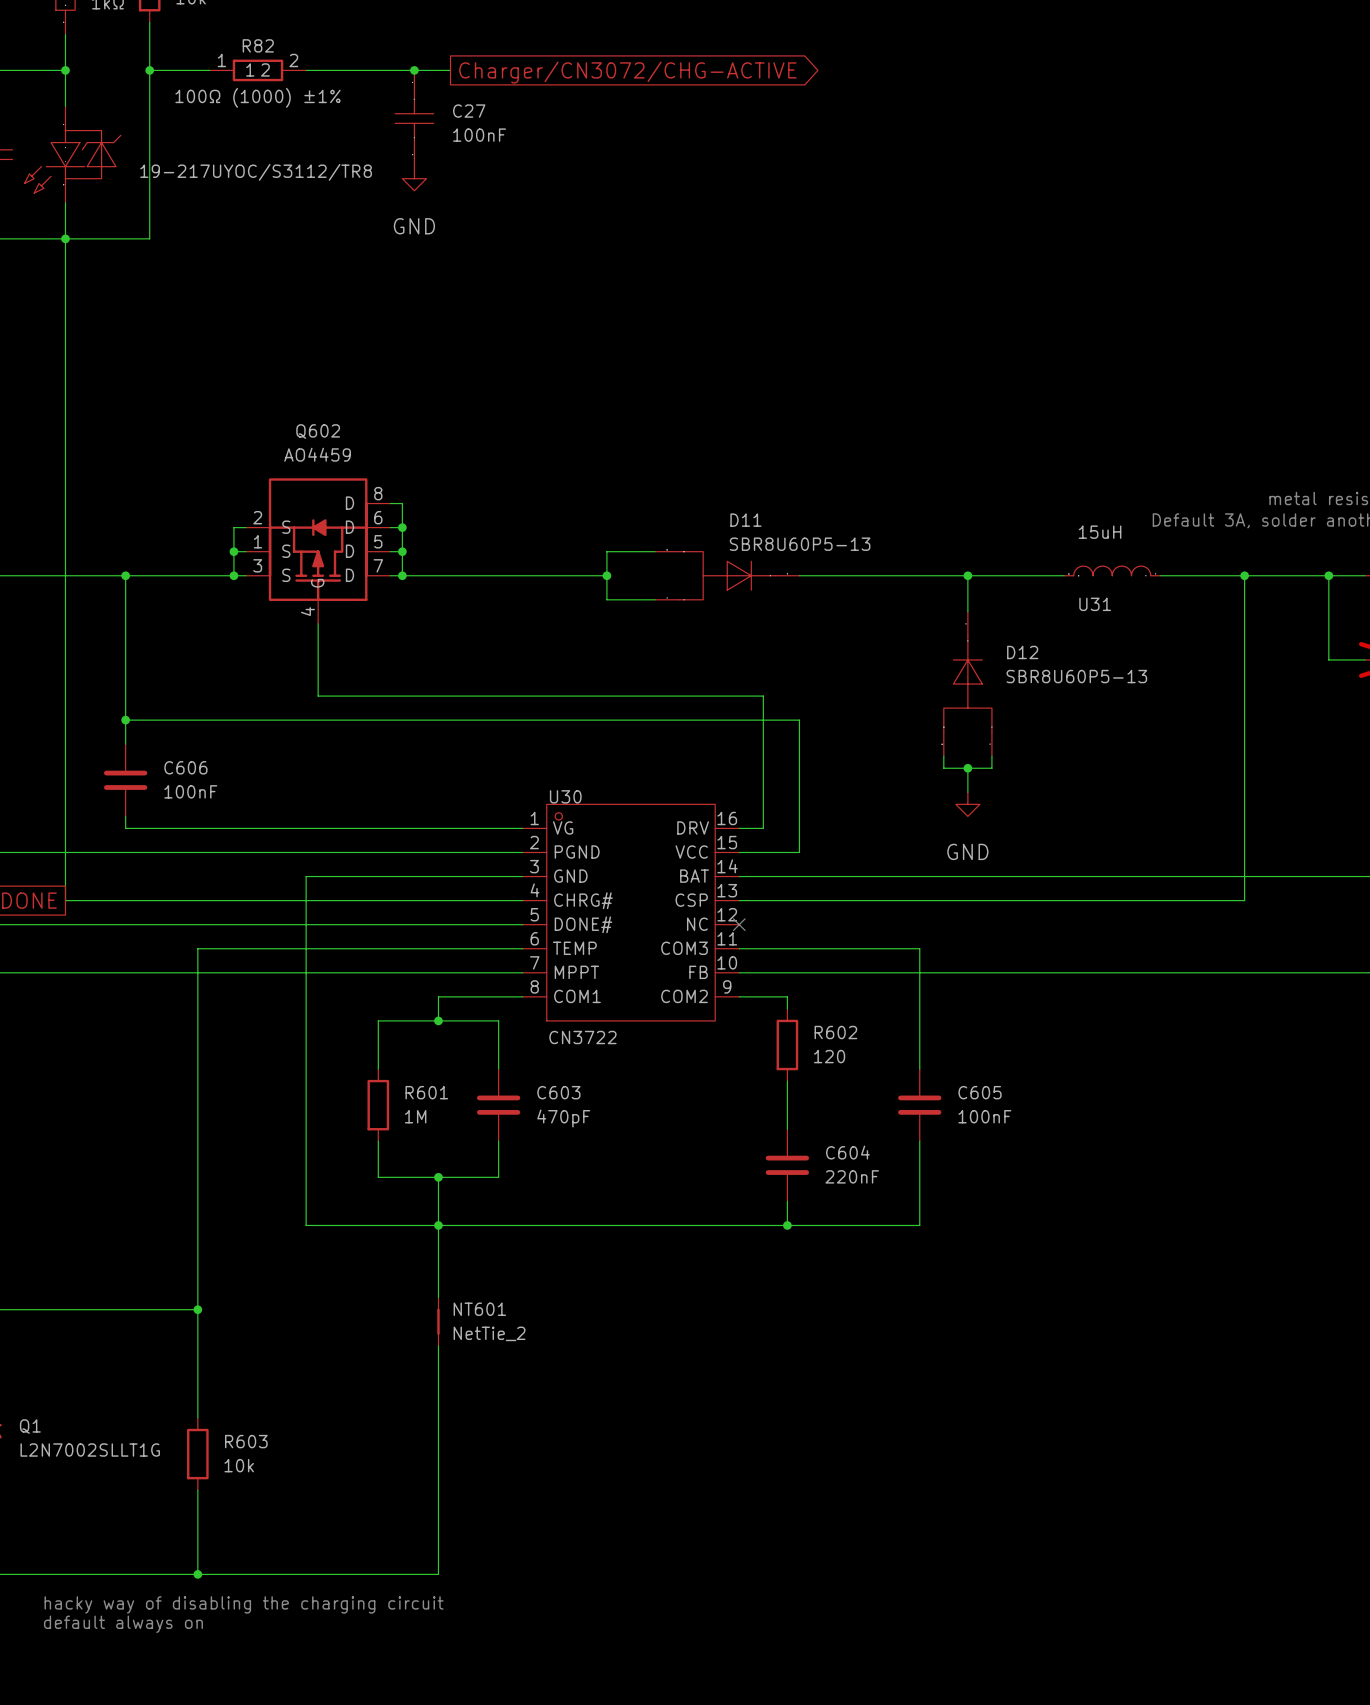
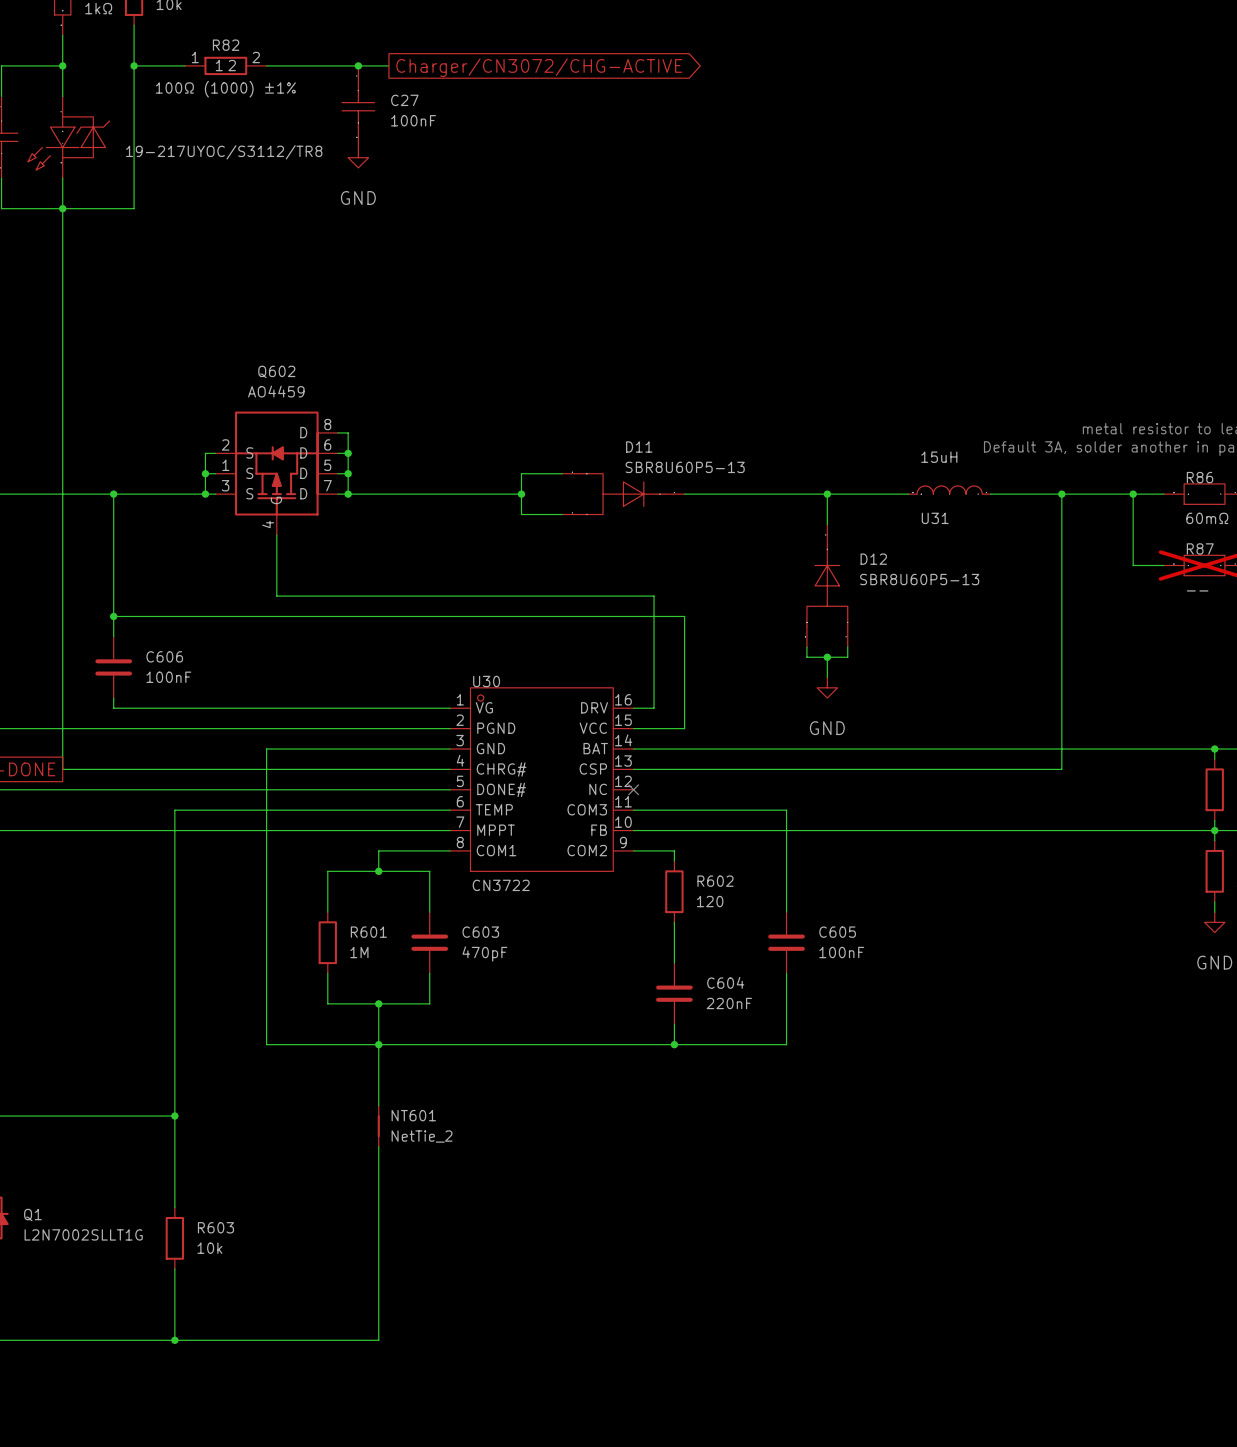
text: hacky way of disabling the charging circuit (244, 1604) -> none
text: default always on (123, 1624) -> none

